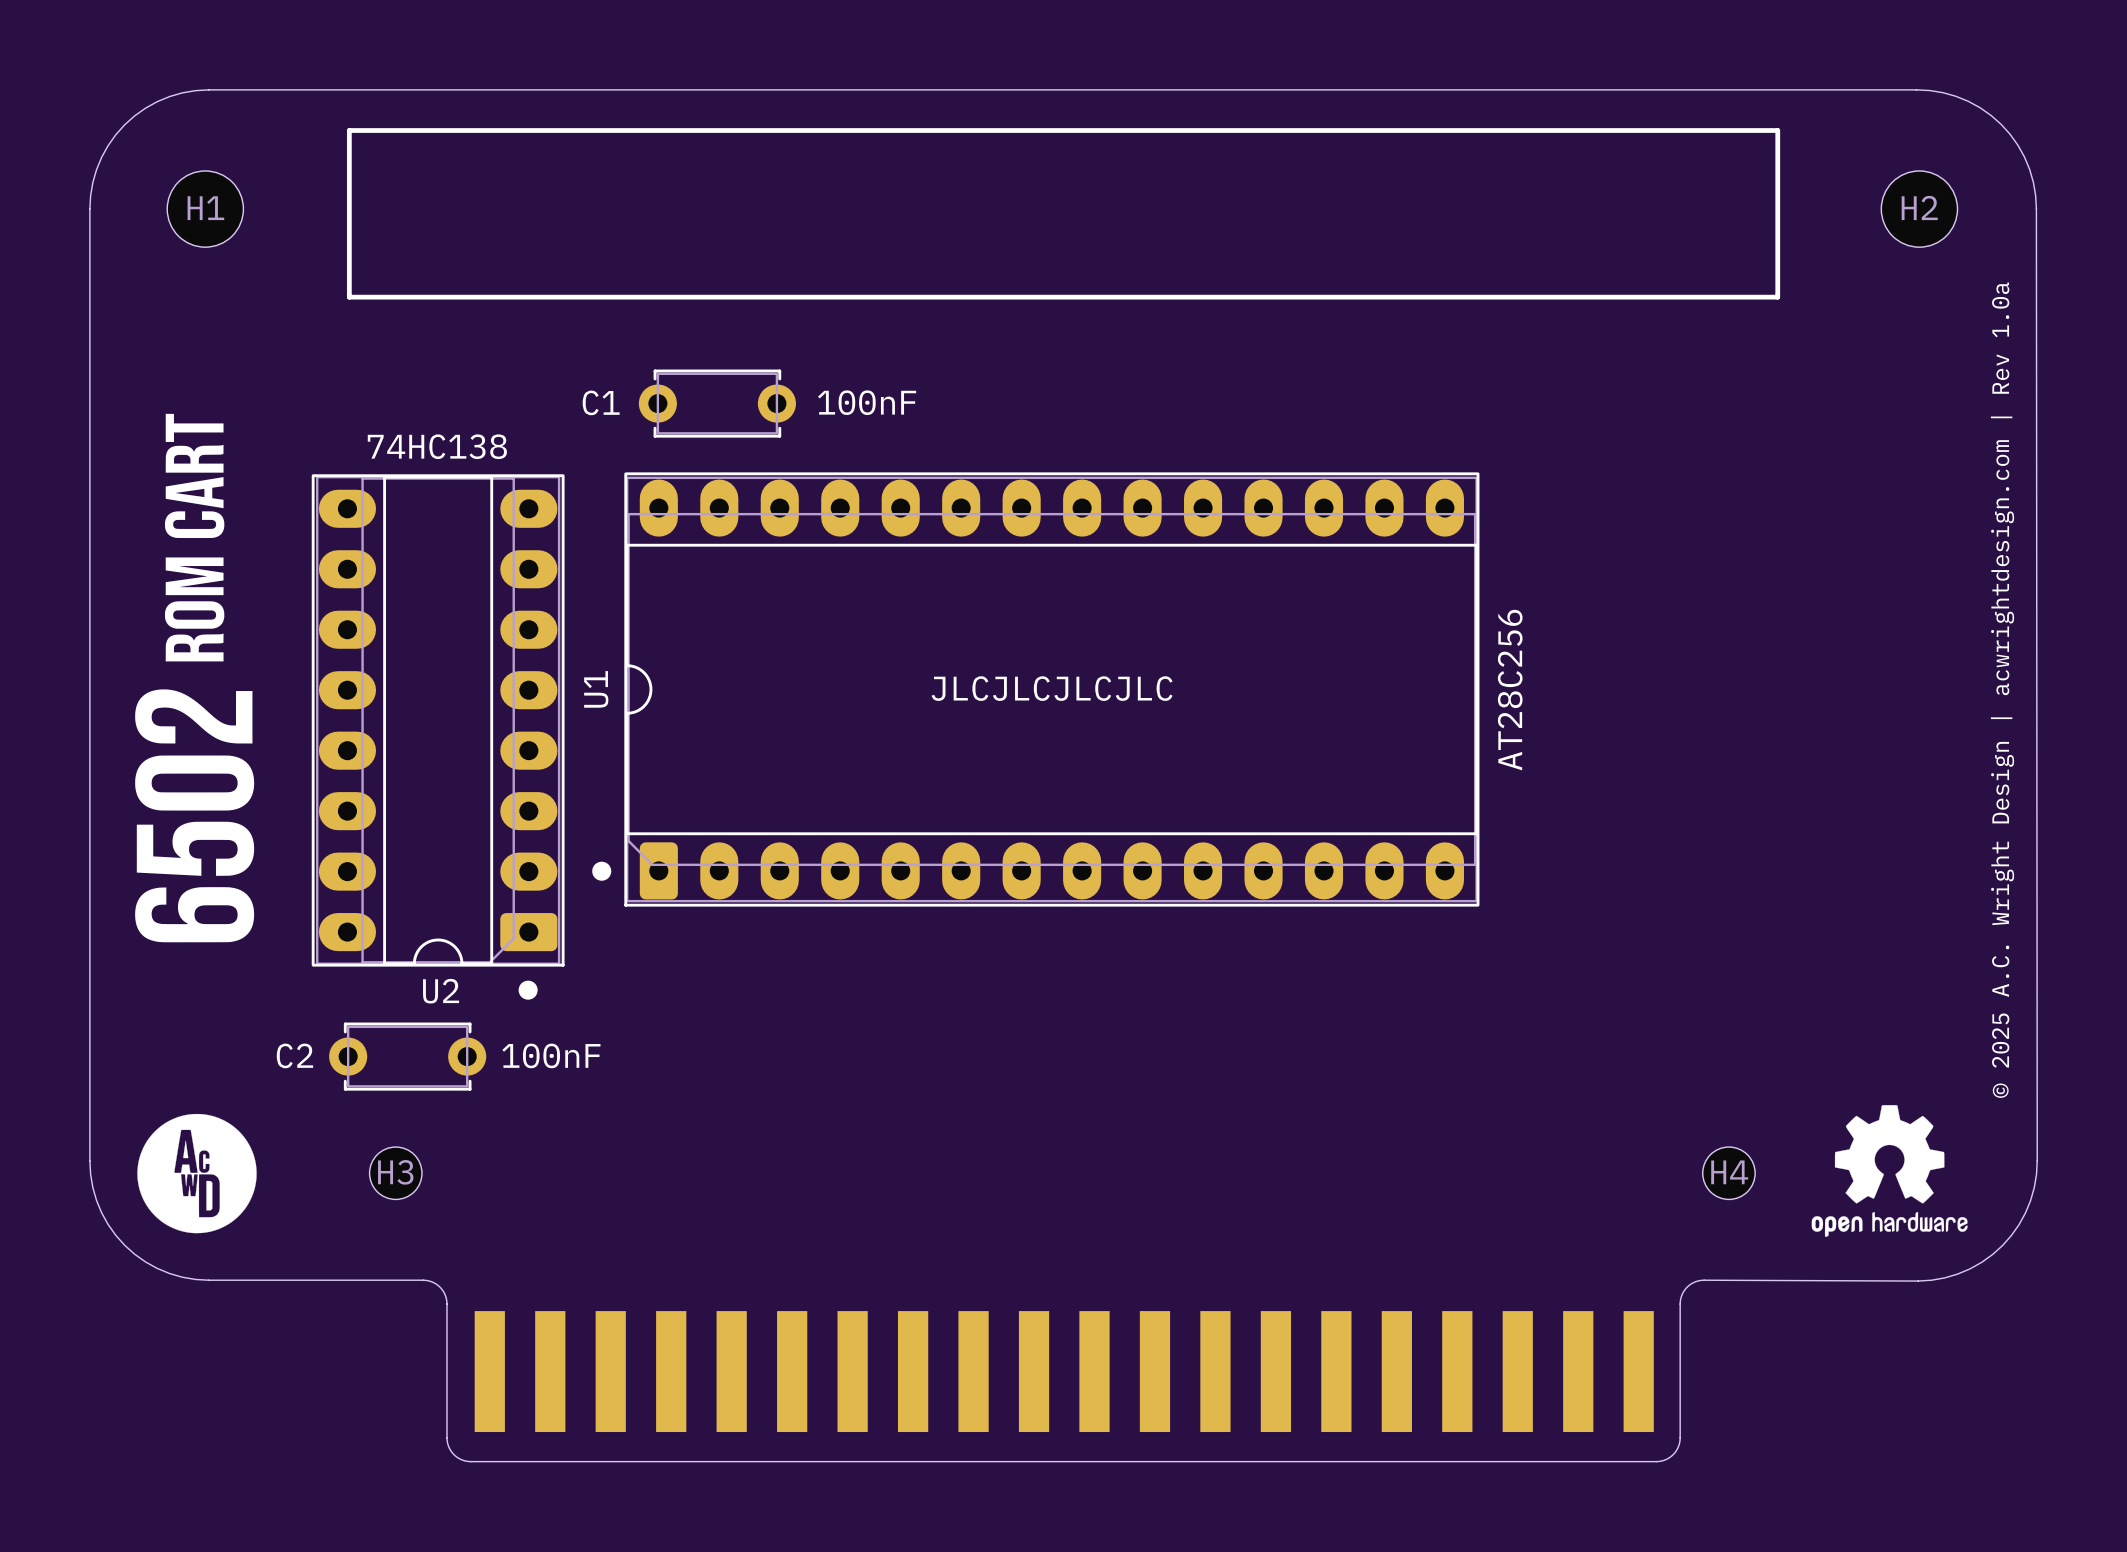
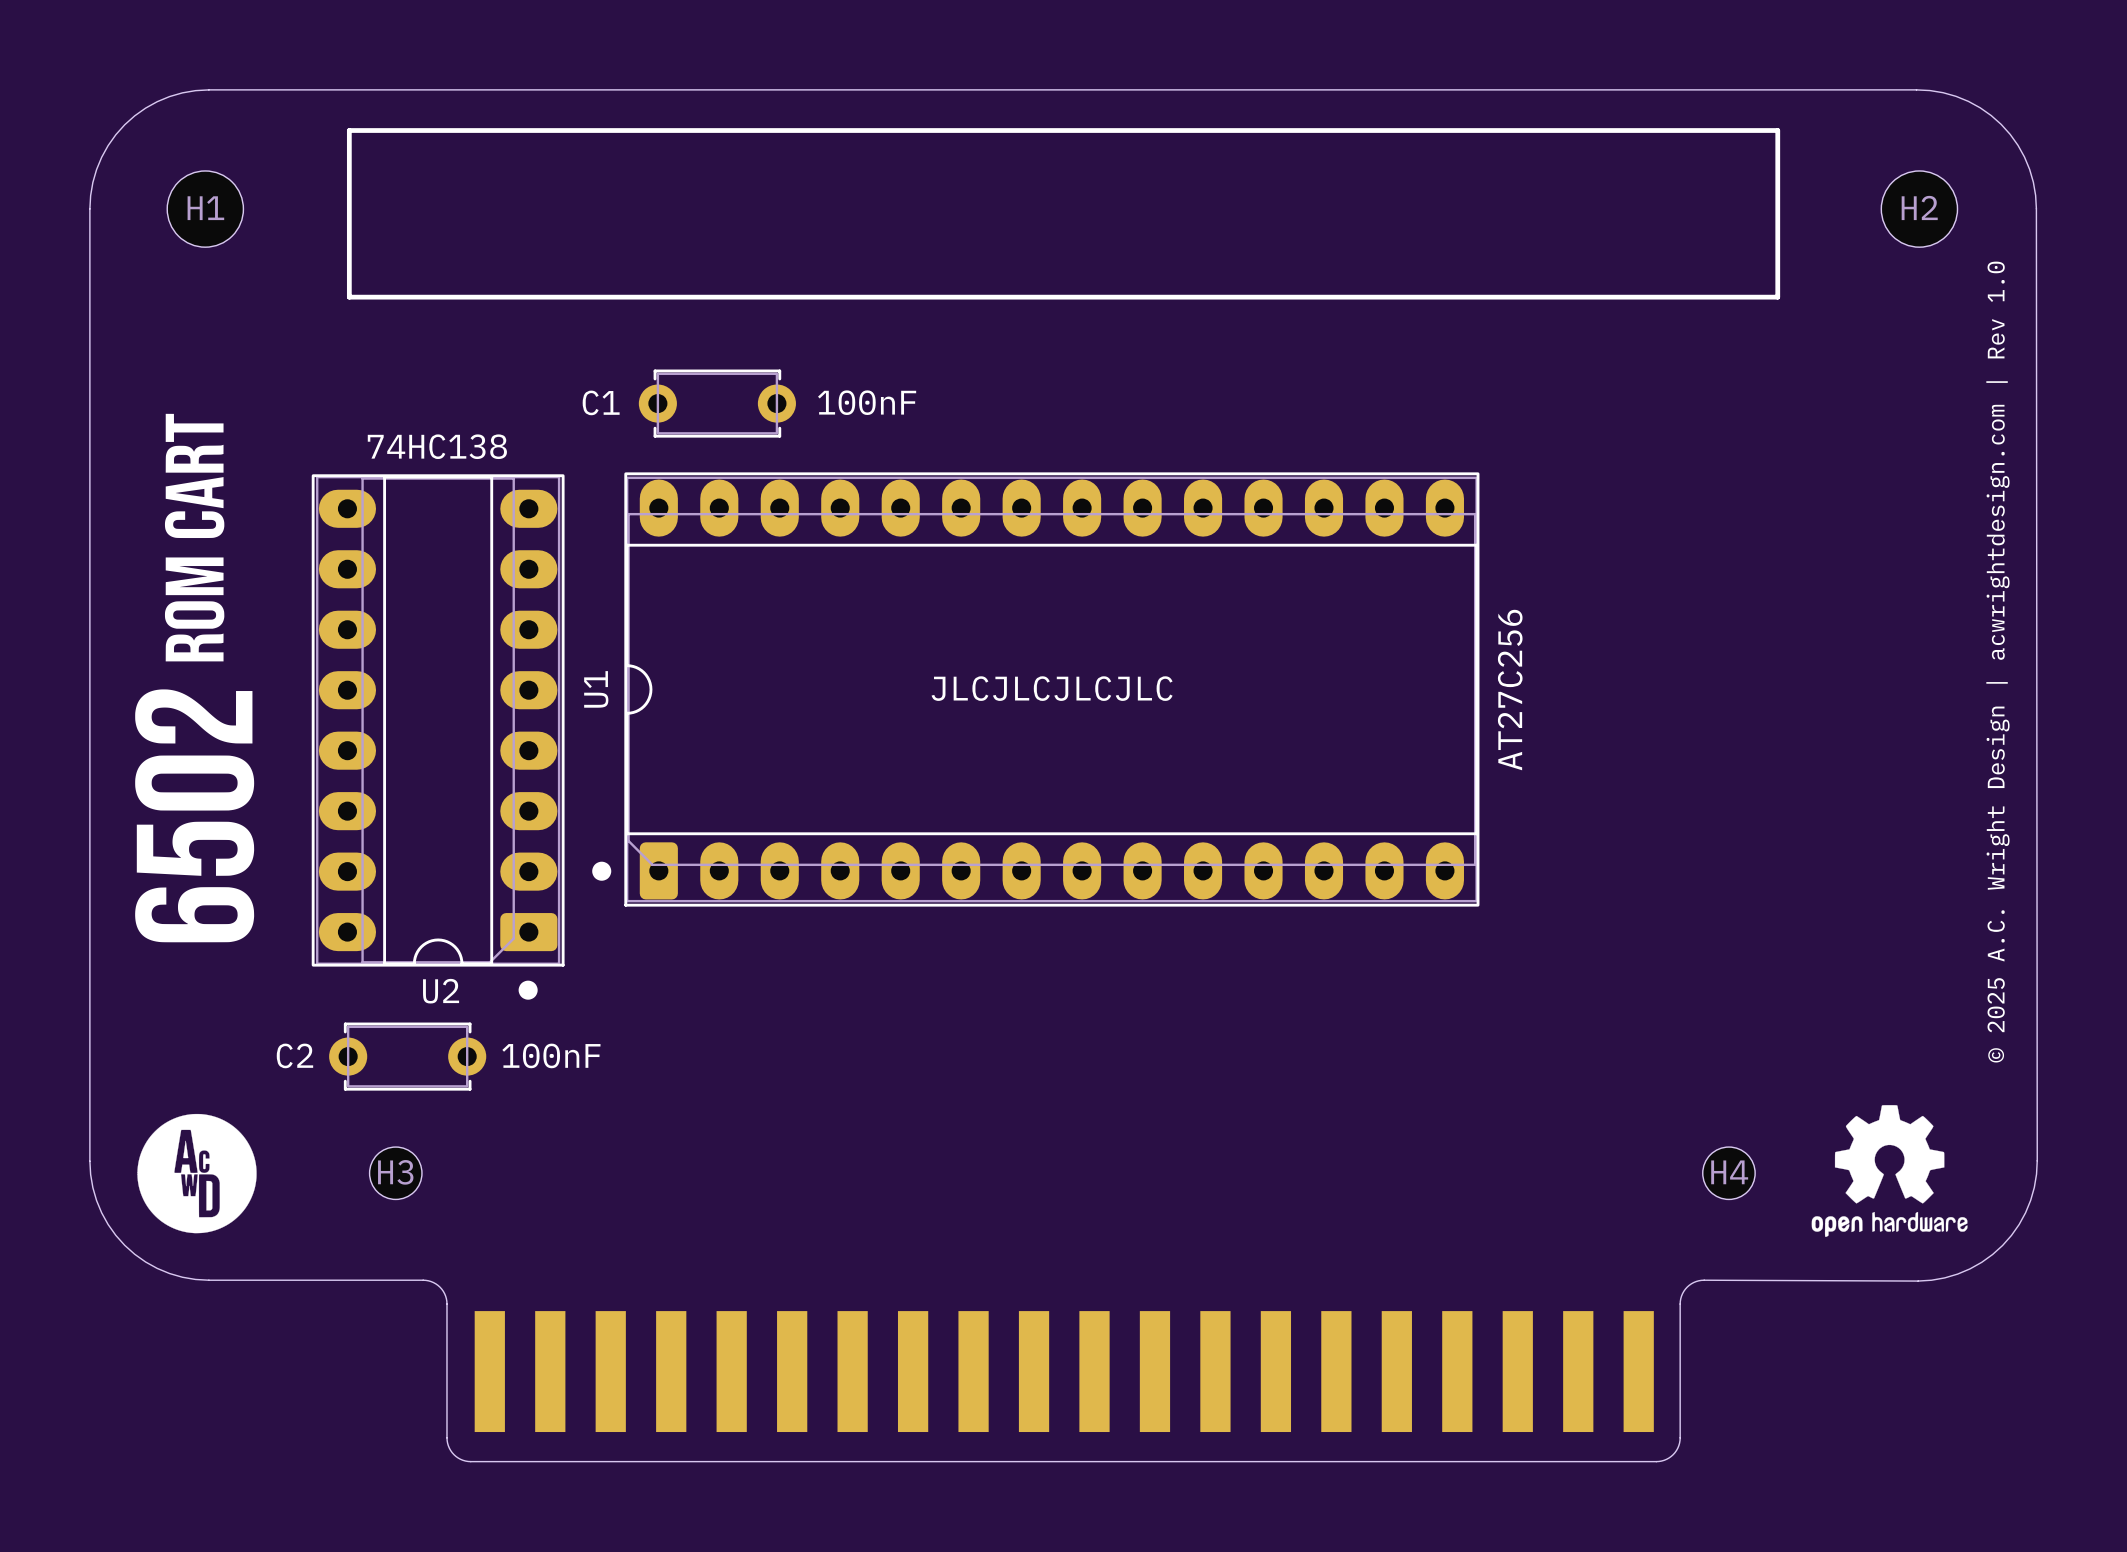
U1 value: AT28C256 (1510, 690) -> AT27C256 (1510, 690)
text: © 2025 A.C. Wright Design | acwrightdesign.com | Rev 1.0a (2002, 690) -> © 2025 A.C. Wright Design | acwrightdesign.com | Rev 1.0 (1997, 662)

